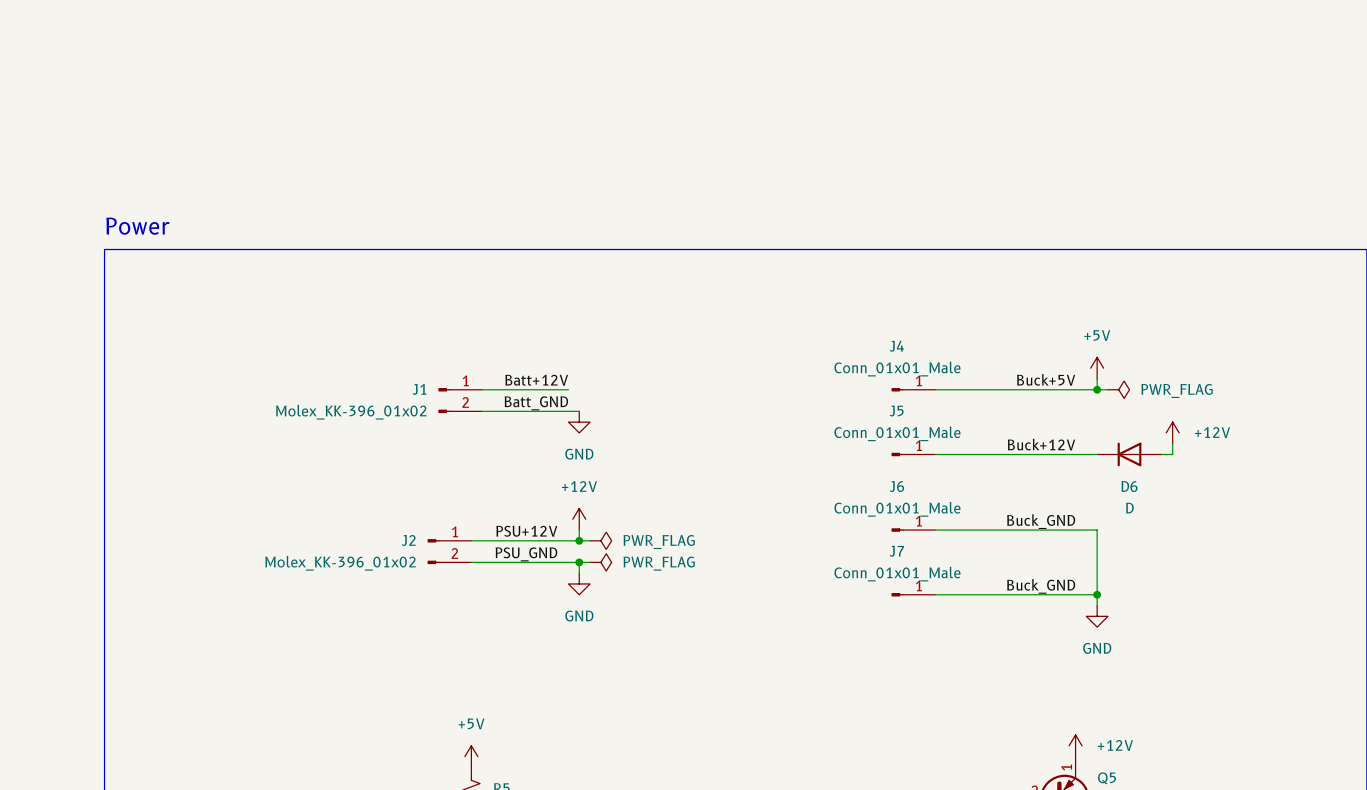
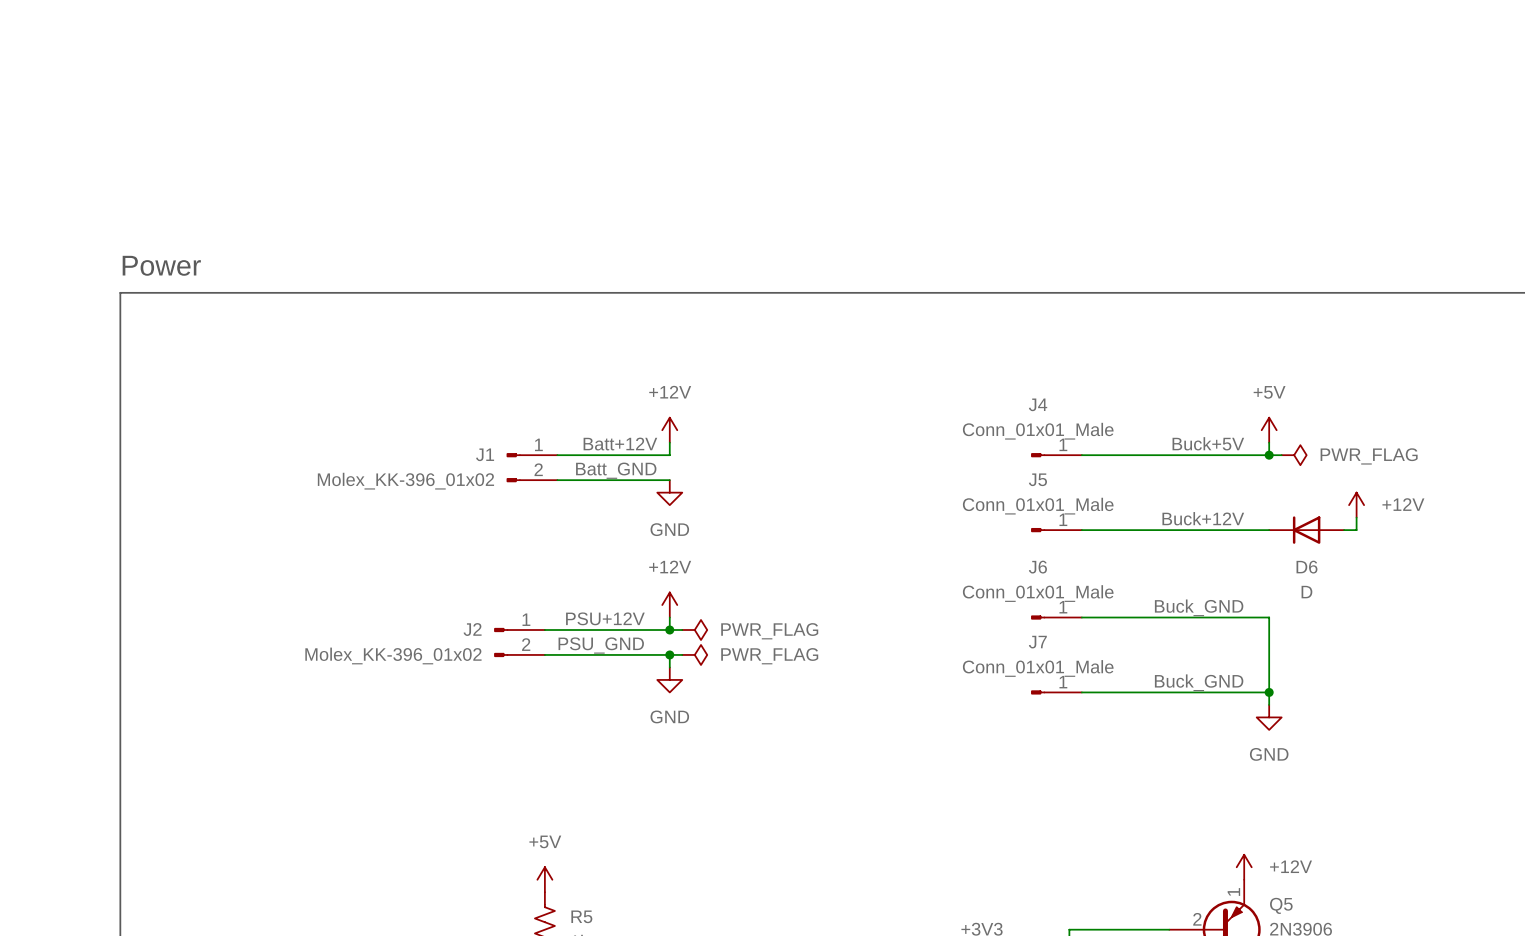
power symbol: none -> +12V (669, 430)
wire: none -> (669, 442) (669, 455) (657, 455)

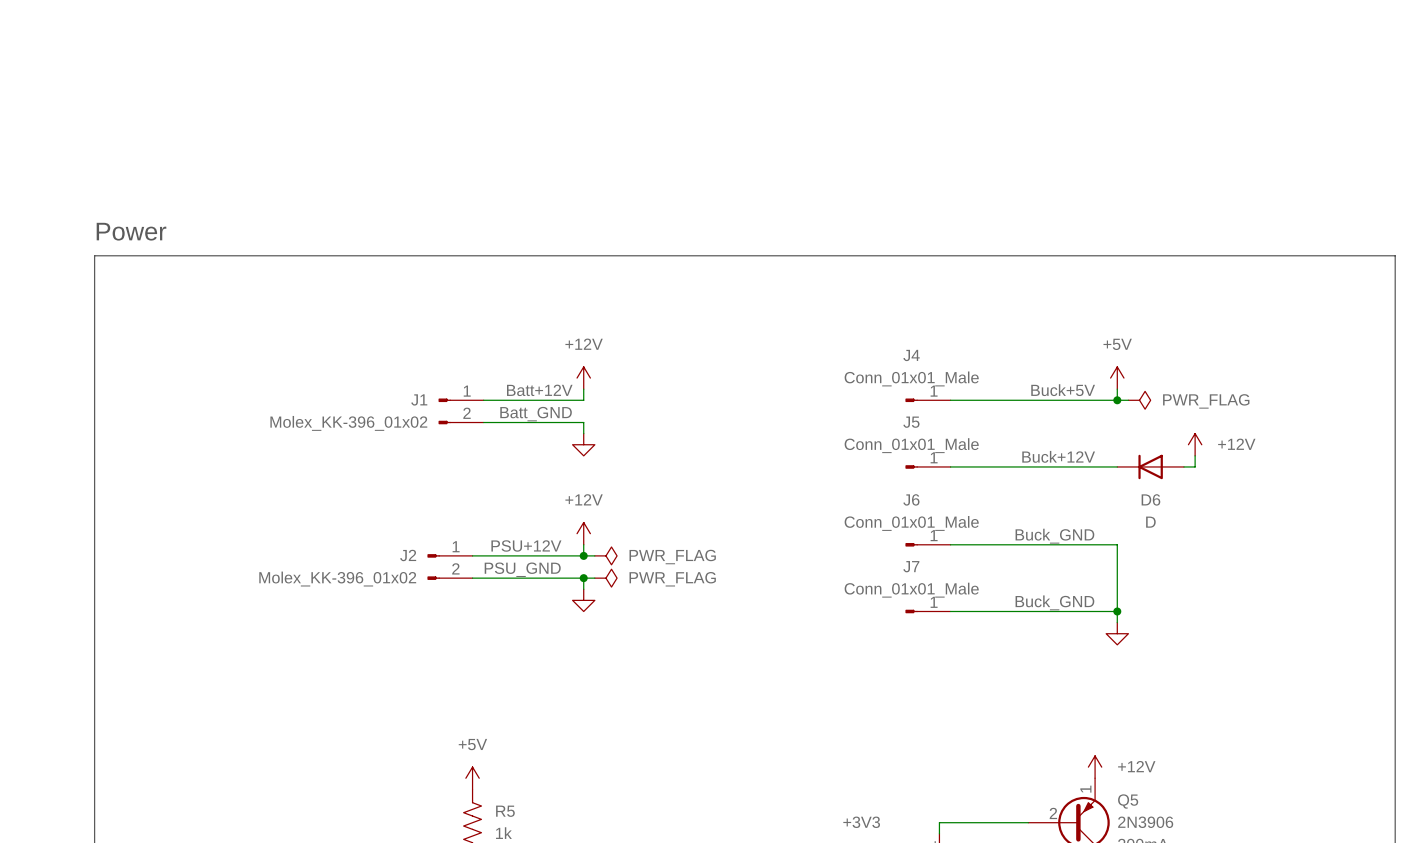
power symbol: GND (669, 492) -> none
power symbol: none -> (583, 444)
power symbol text: GND (669, 716) -> none
power symbol text: GND (1269, 754) -> none

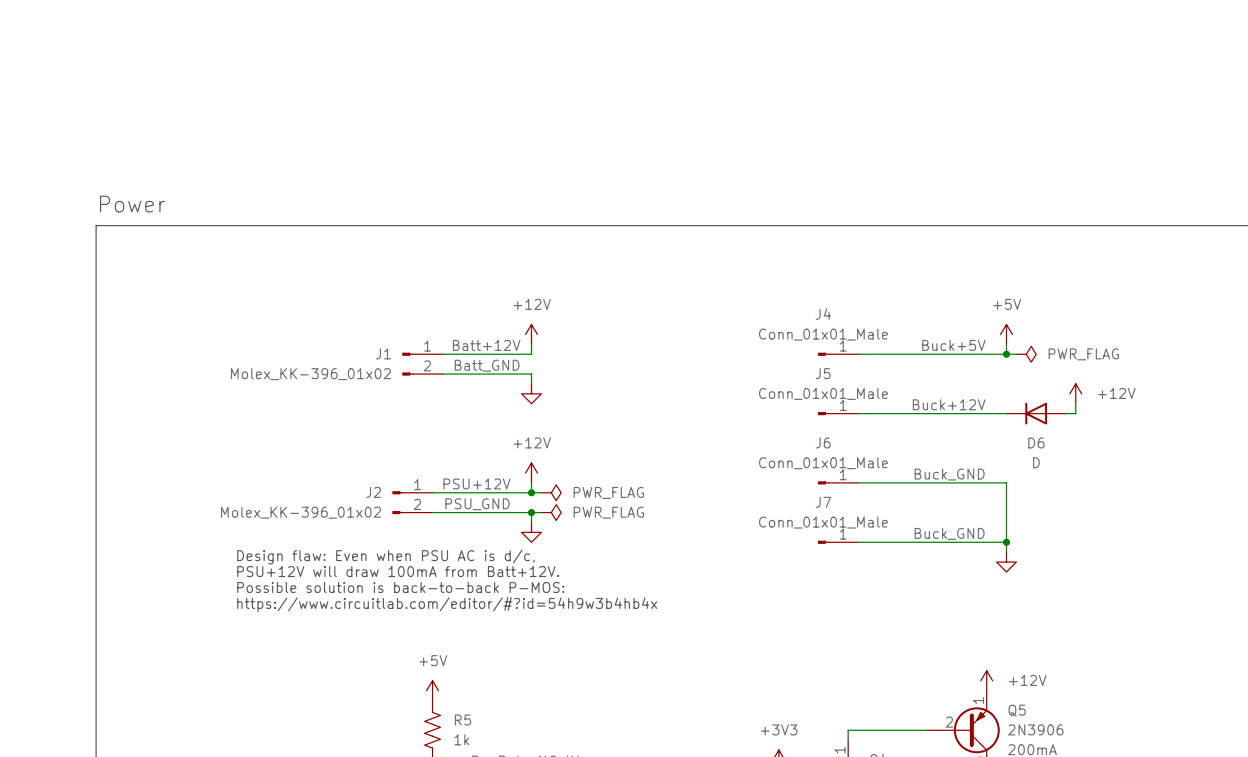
text: none -> Design flaw: Even when PSU AC is d/c, (385, 557)
text: none -> PSU+12V will draw 100mA from Batt+12V. (398, 571)
text: none -> Possible solution is back-to-back P-MOS: (400, 587)
text: none -> https://www.circuitlab.com/editor/#?id=54h9w3b4hb4x (447, 604)

